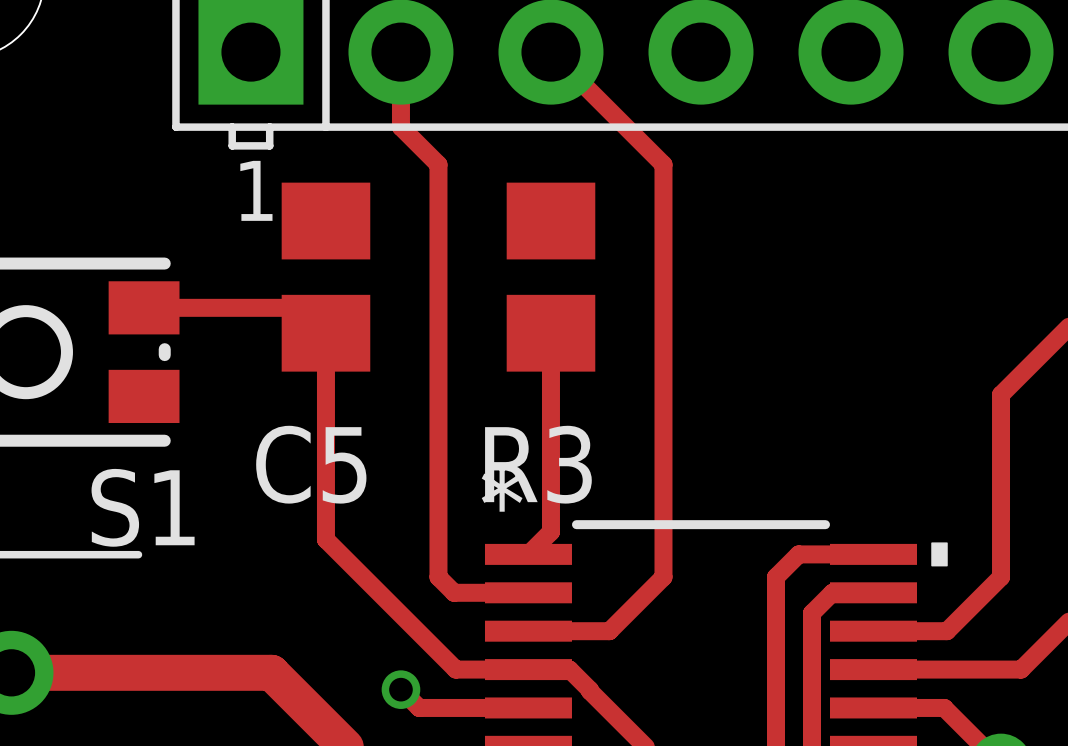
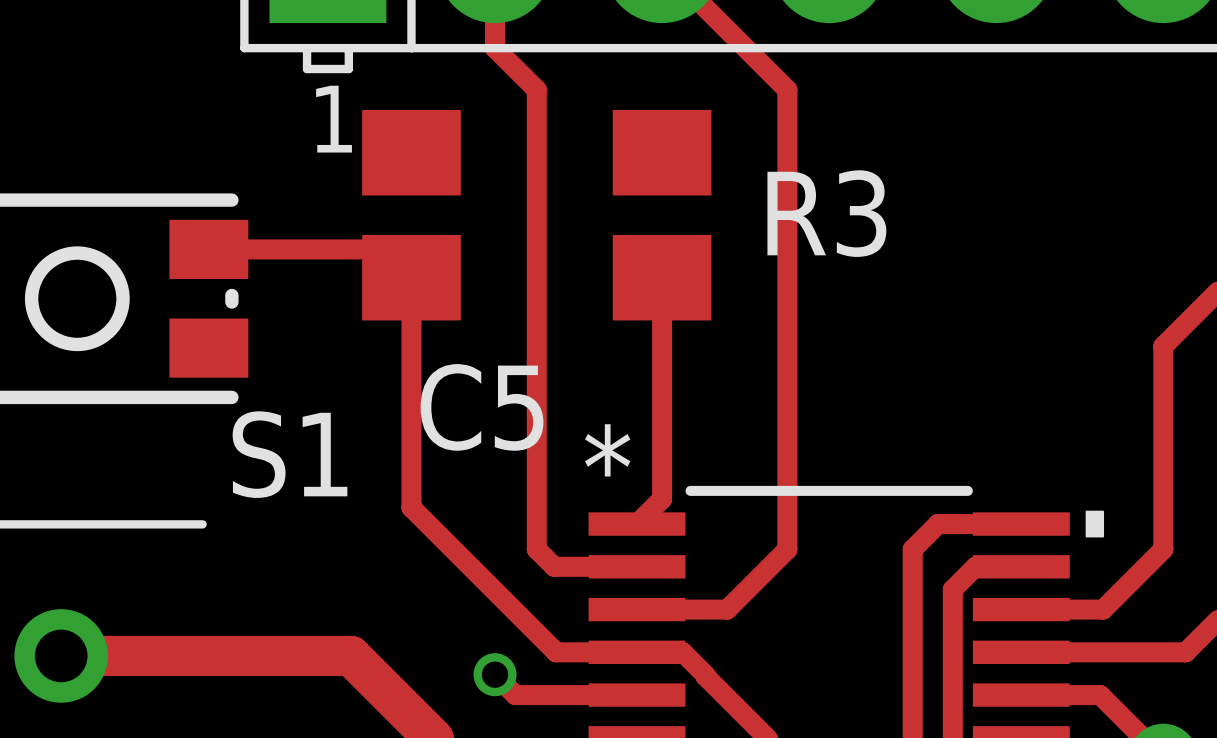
C5 name position: C5 (311, 464) -> C5 (482, 407)
R3 name position: R3 (538, 464) -> R3 (826, 213)
S1 name position: S1 (143, 507) -> S1 (290, 454)

